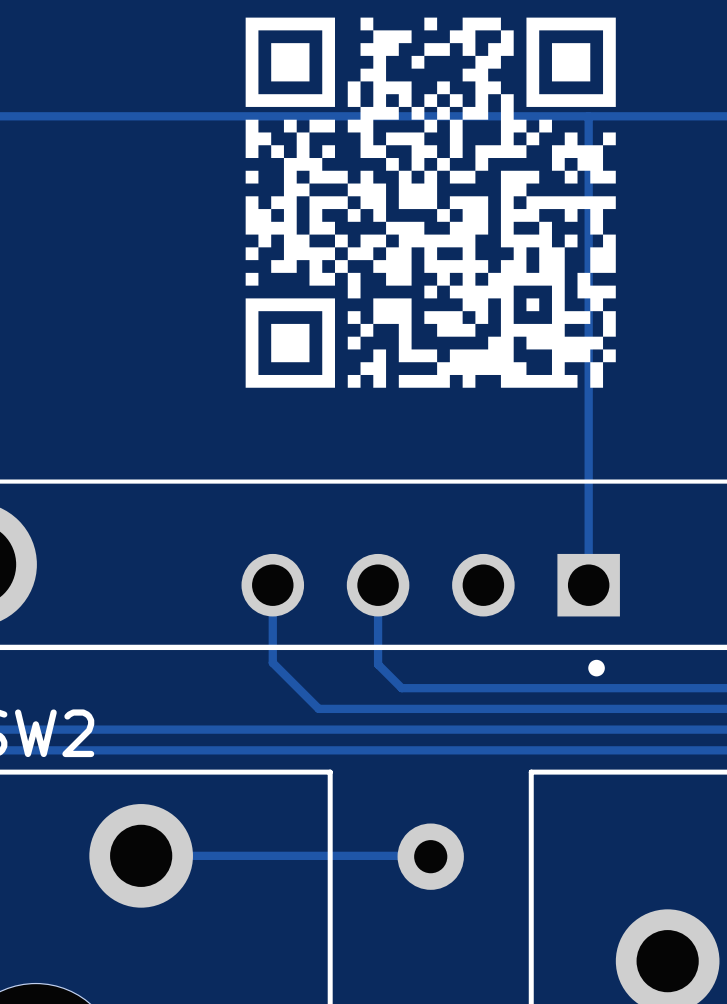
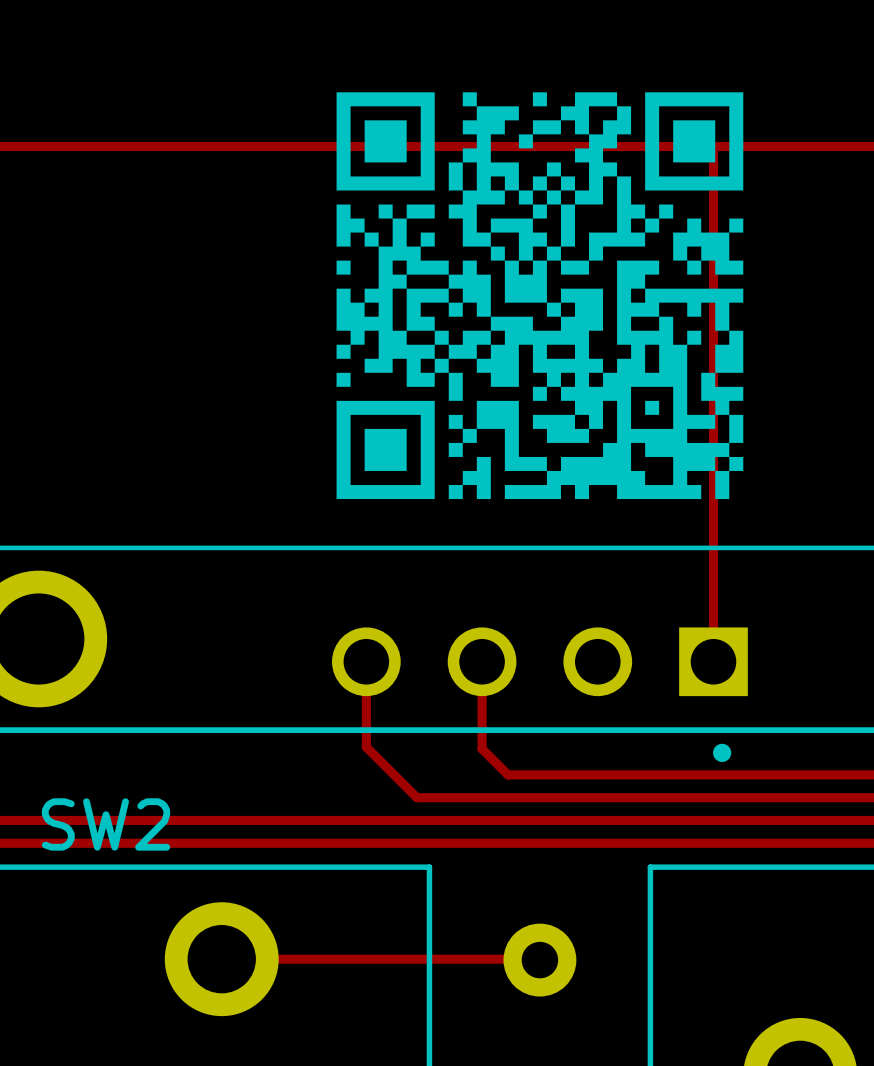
drawing position: (430, 202) -> (539, 295)

